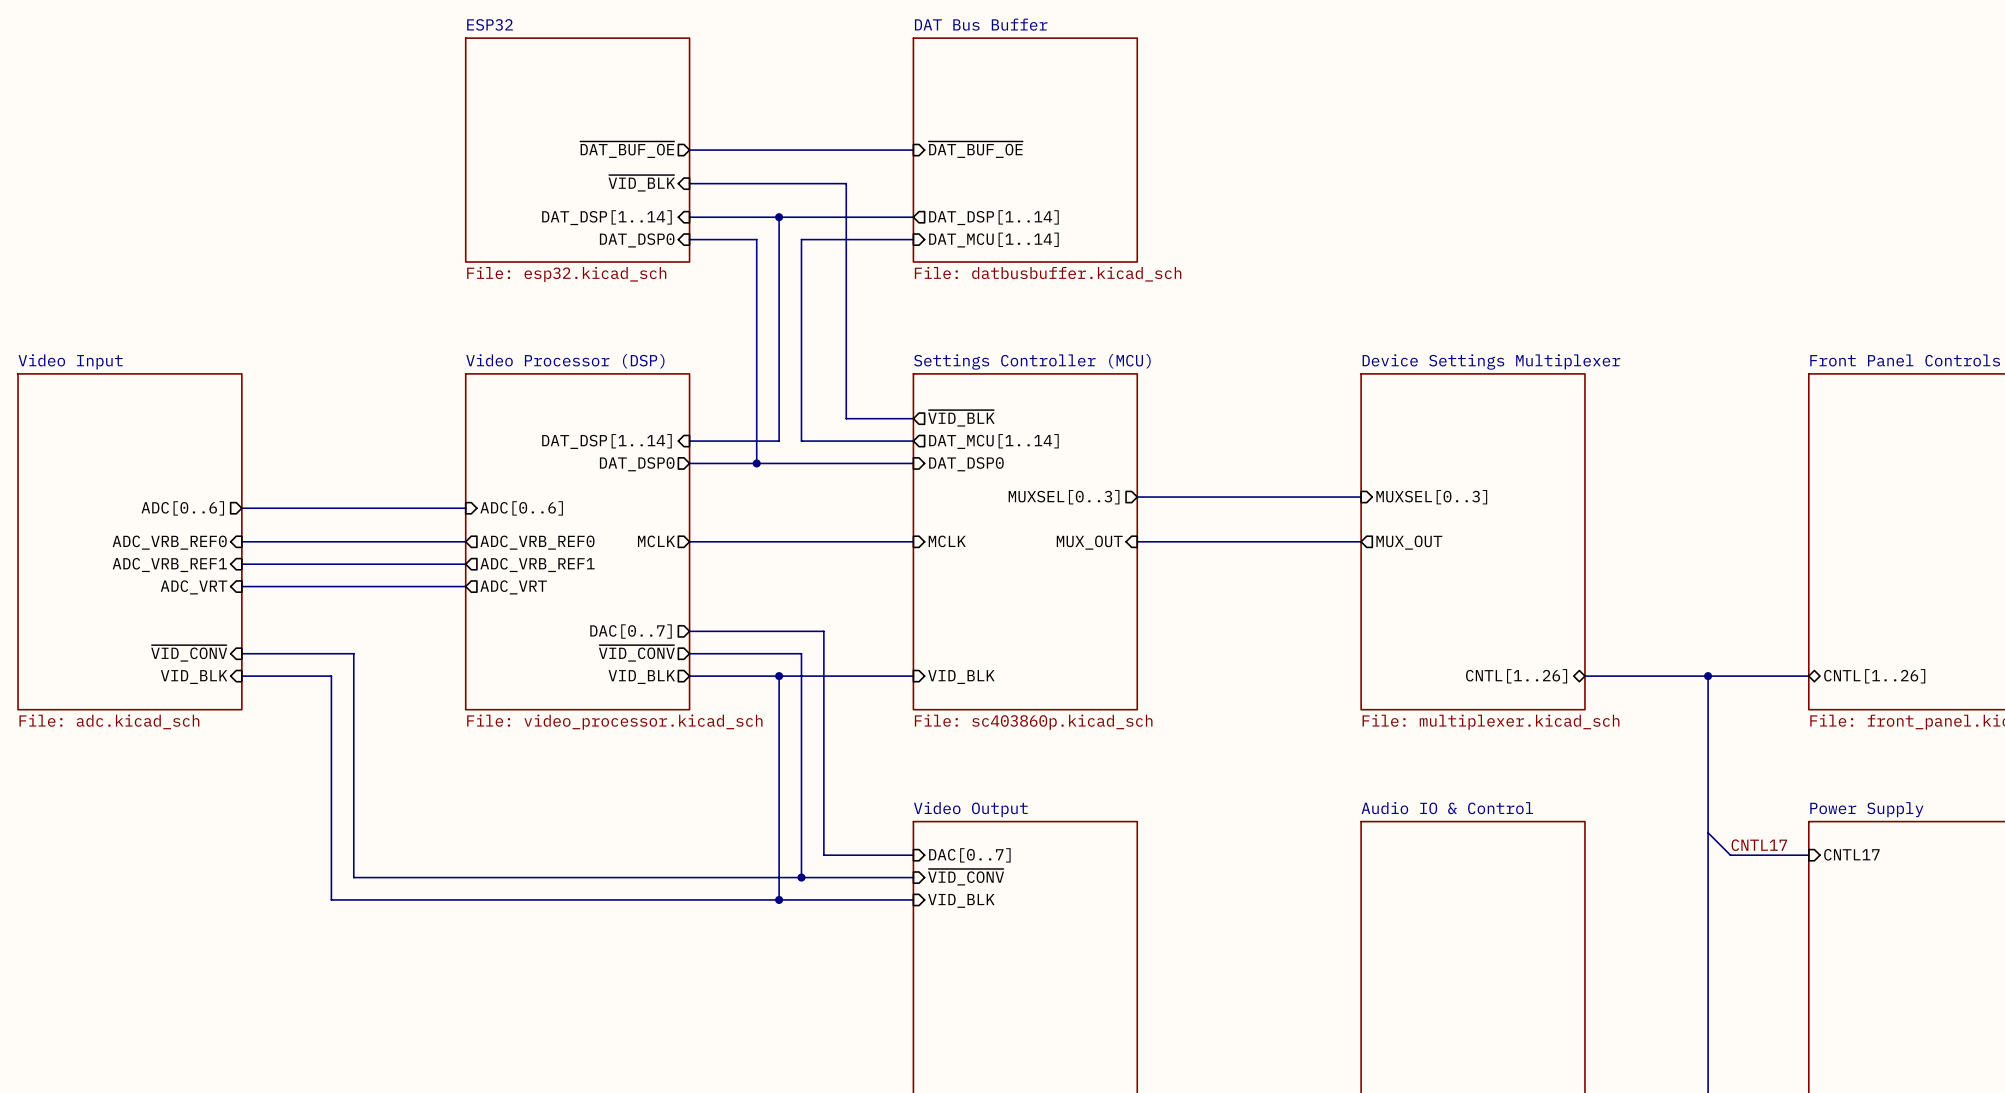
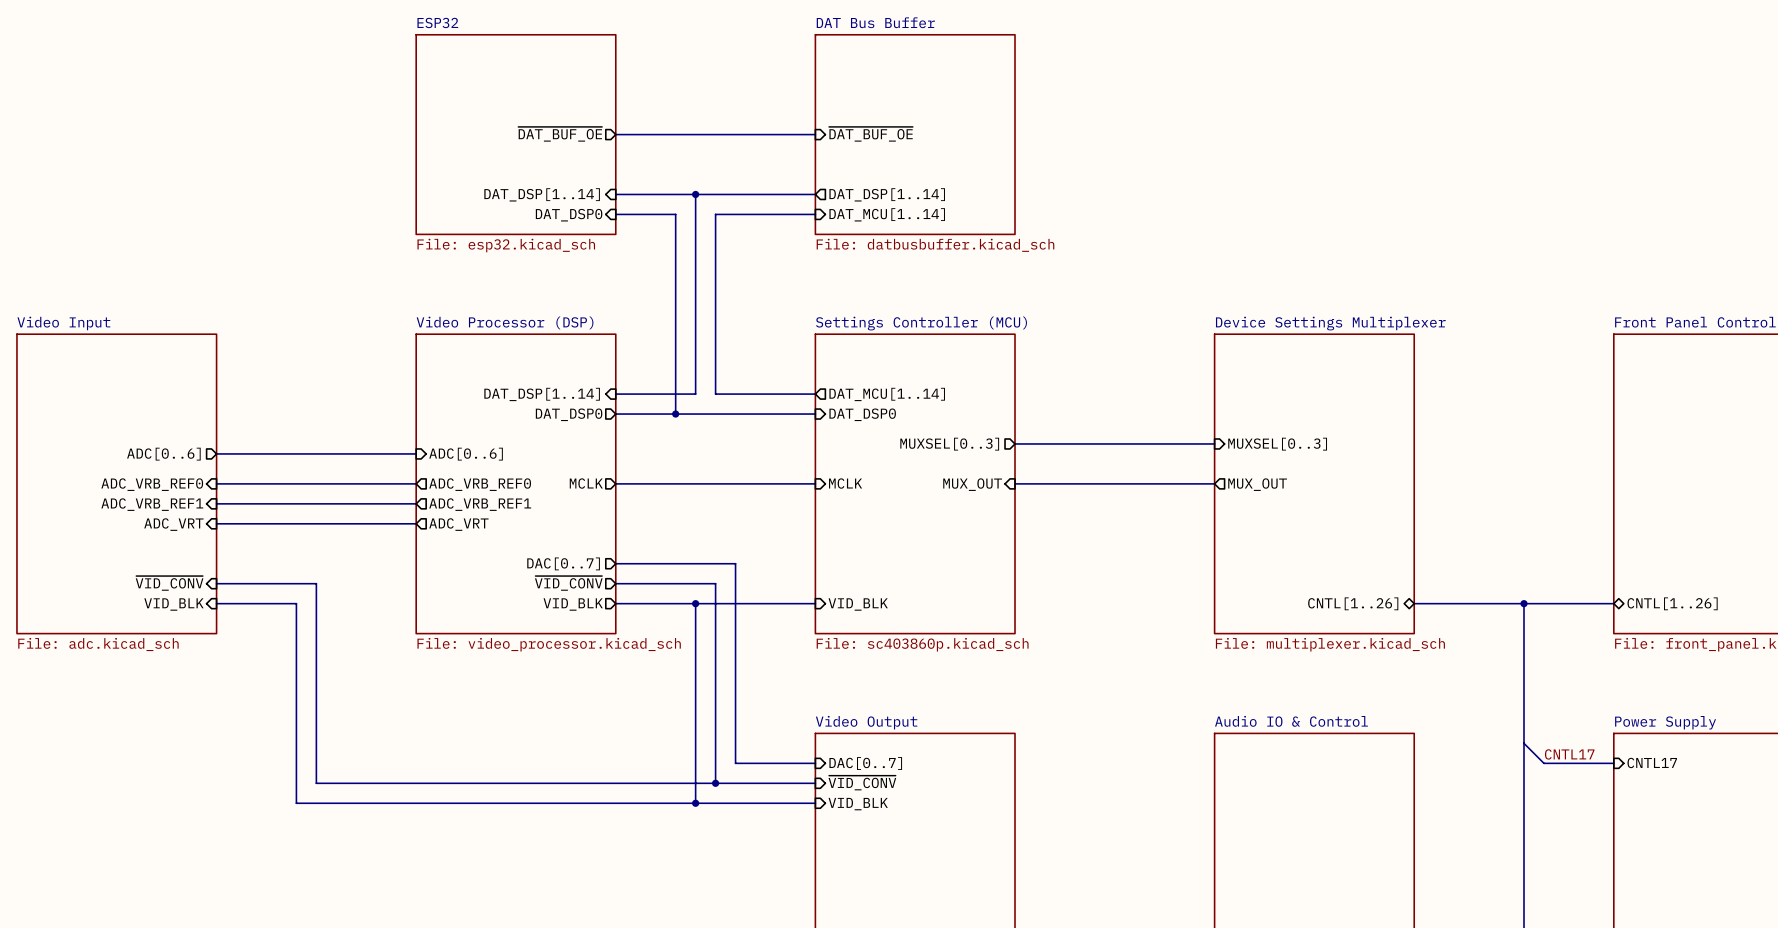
sheet pin: ~{VID_BLK} (641, 183) -> none
wire: (689, 183) (846, 183) (846, 418) (913, 418) -> none
sheet pin: ~{VID_BLK} (961, 418) -> none

